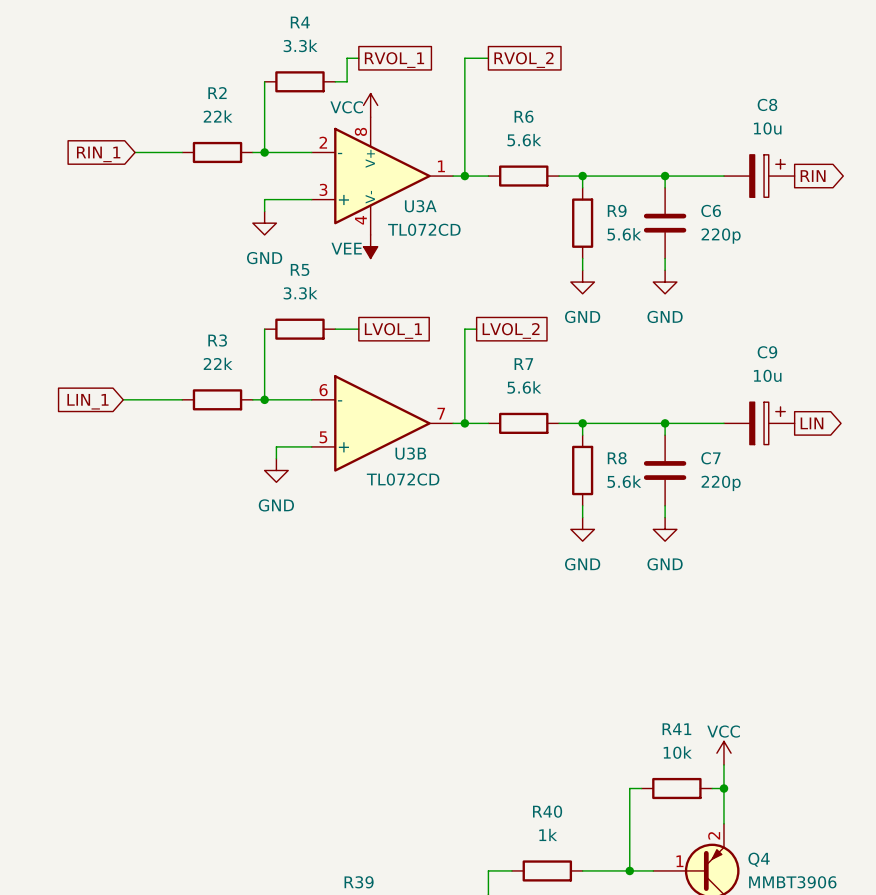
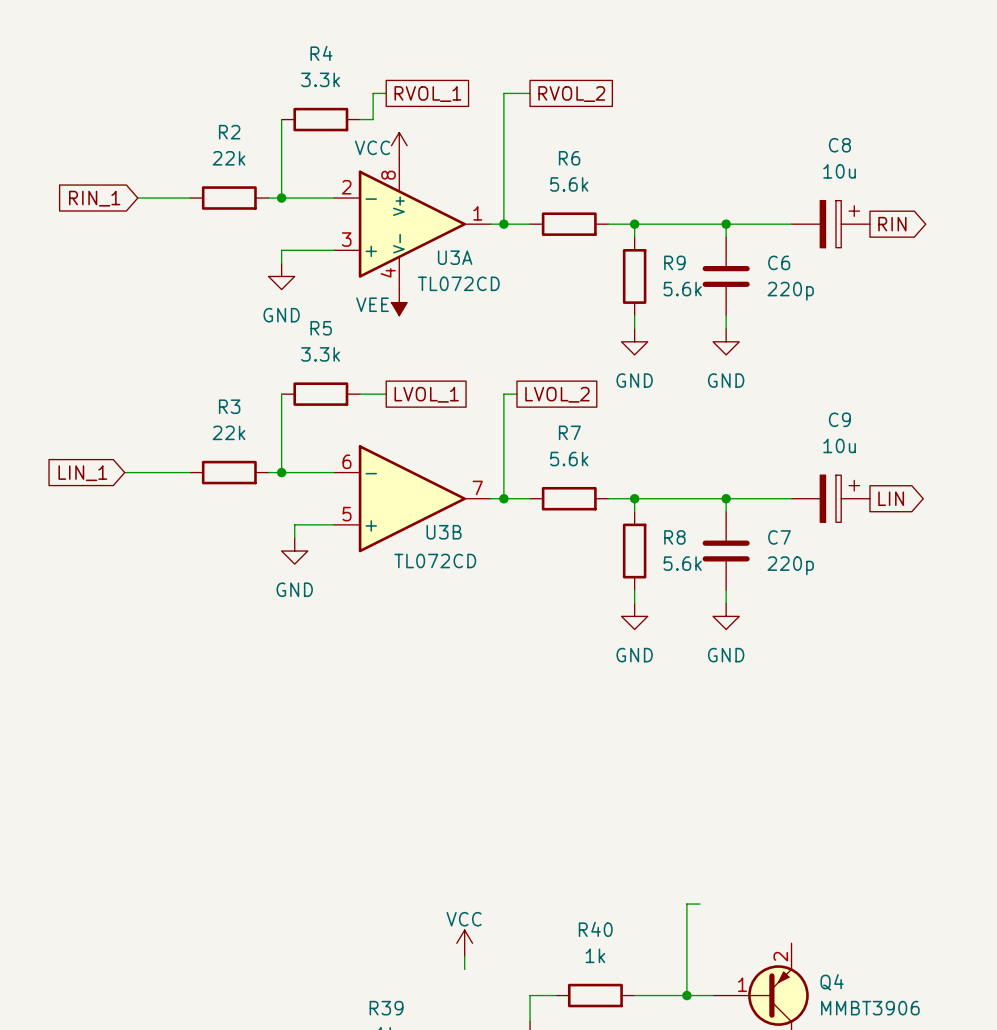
power symbol: VCC (723, 753) -> none
wire: (723, 764) (723, 823) -> none
R41: 10k (676, 788) -> none
wire: (712, 788) (723, 788) -> none
junction: (723, 788) -> none
power symbol: none -> VCC (464, 943)
wire: none -> (464, 956) (464, 969)

